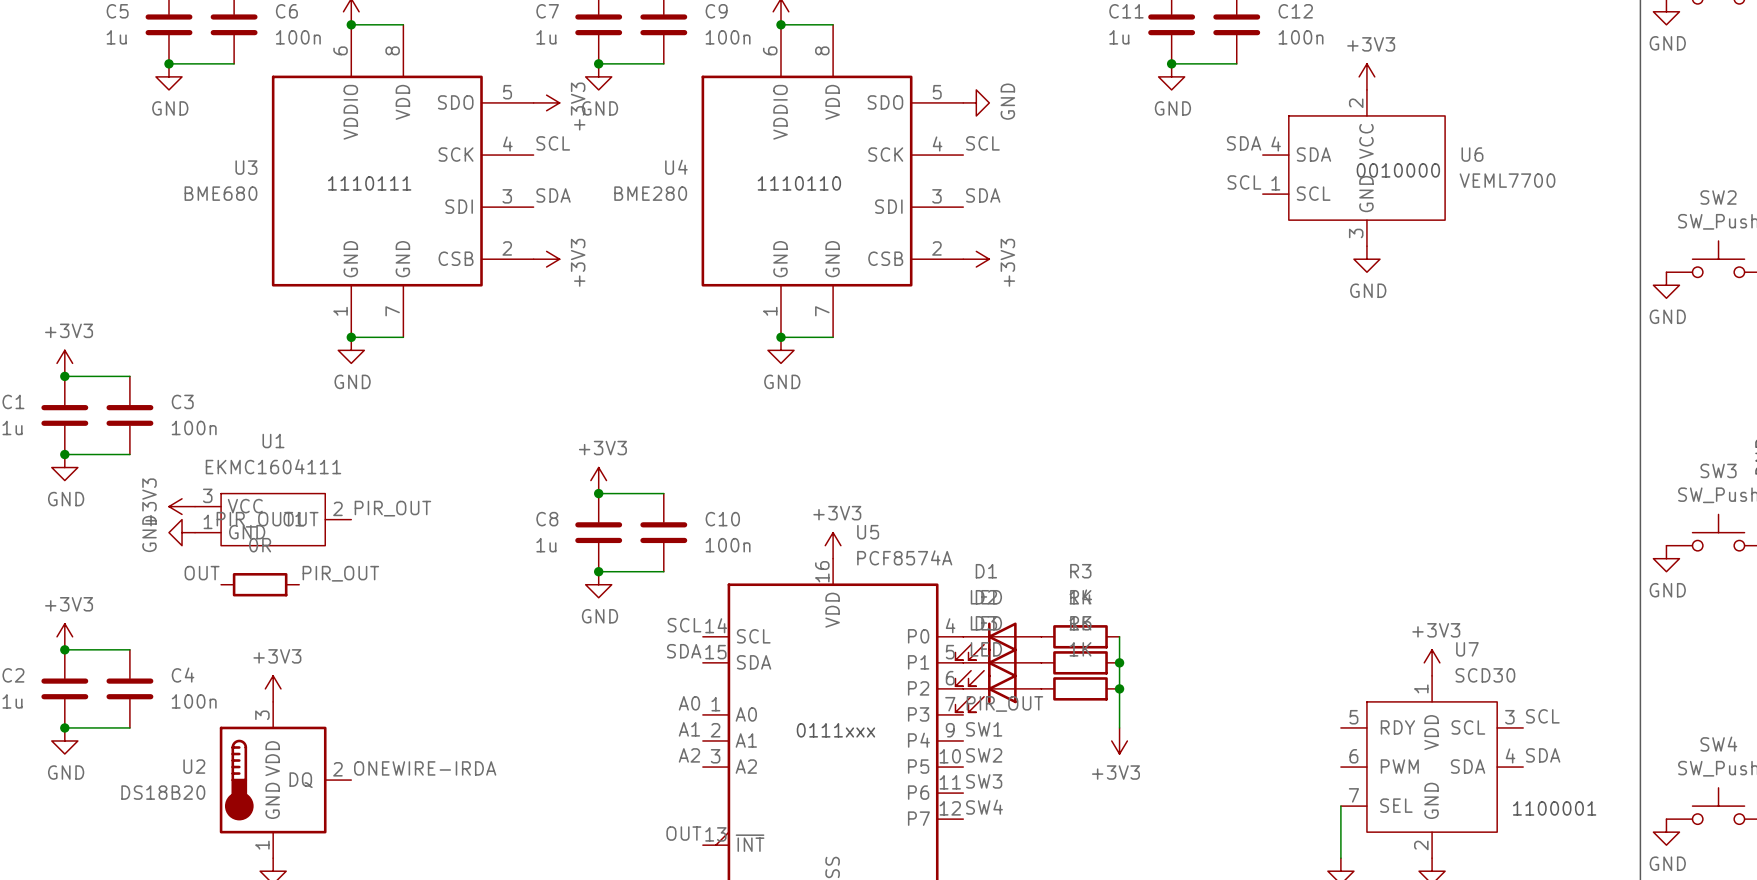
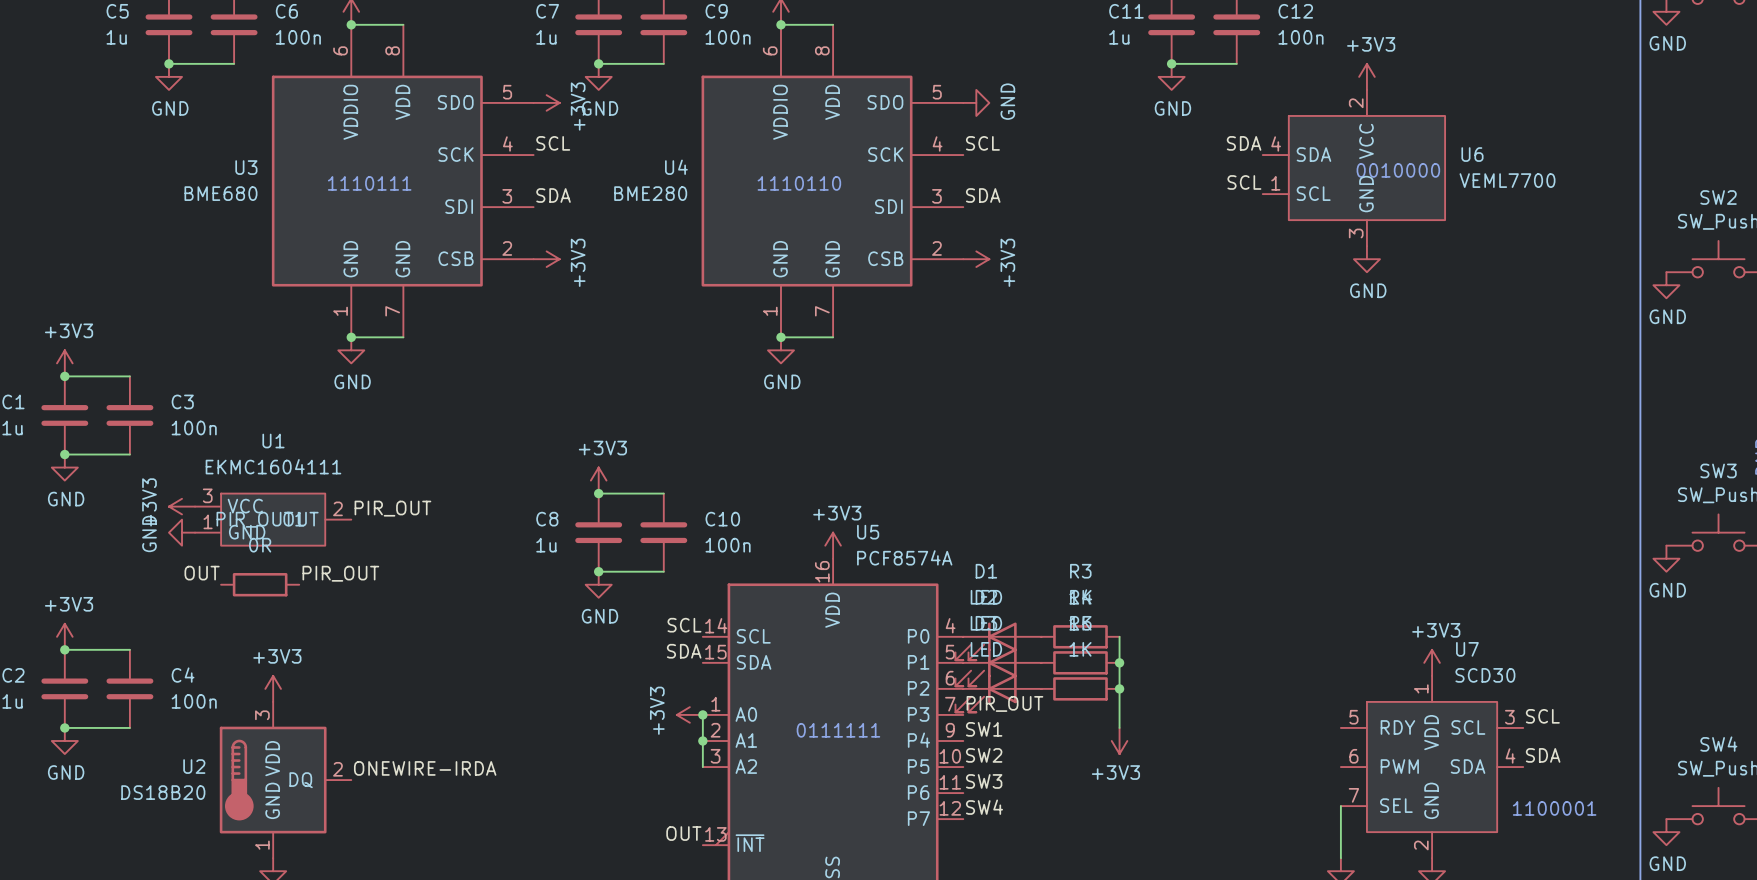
label: A0 (689, 703) -> none
power symbol: none -> +3V3 (689, 714)
wire: none -> (702, 714) (702, 767)
junction: none -> (702, 714)
label: A1 (689, 729) -> none
text: 0111xxx (835, 730) -> 0111111 (838, 730)
junction: none -> (702, 740)
label: A2 (689, 755) -> none

